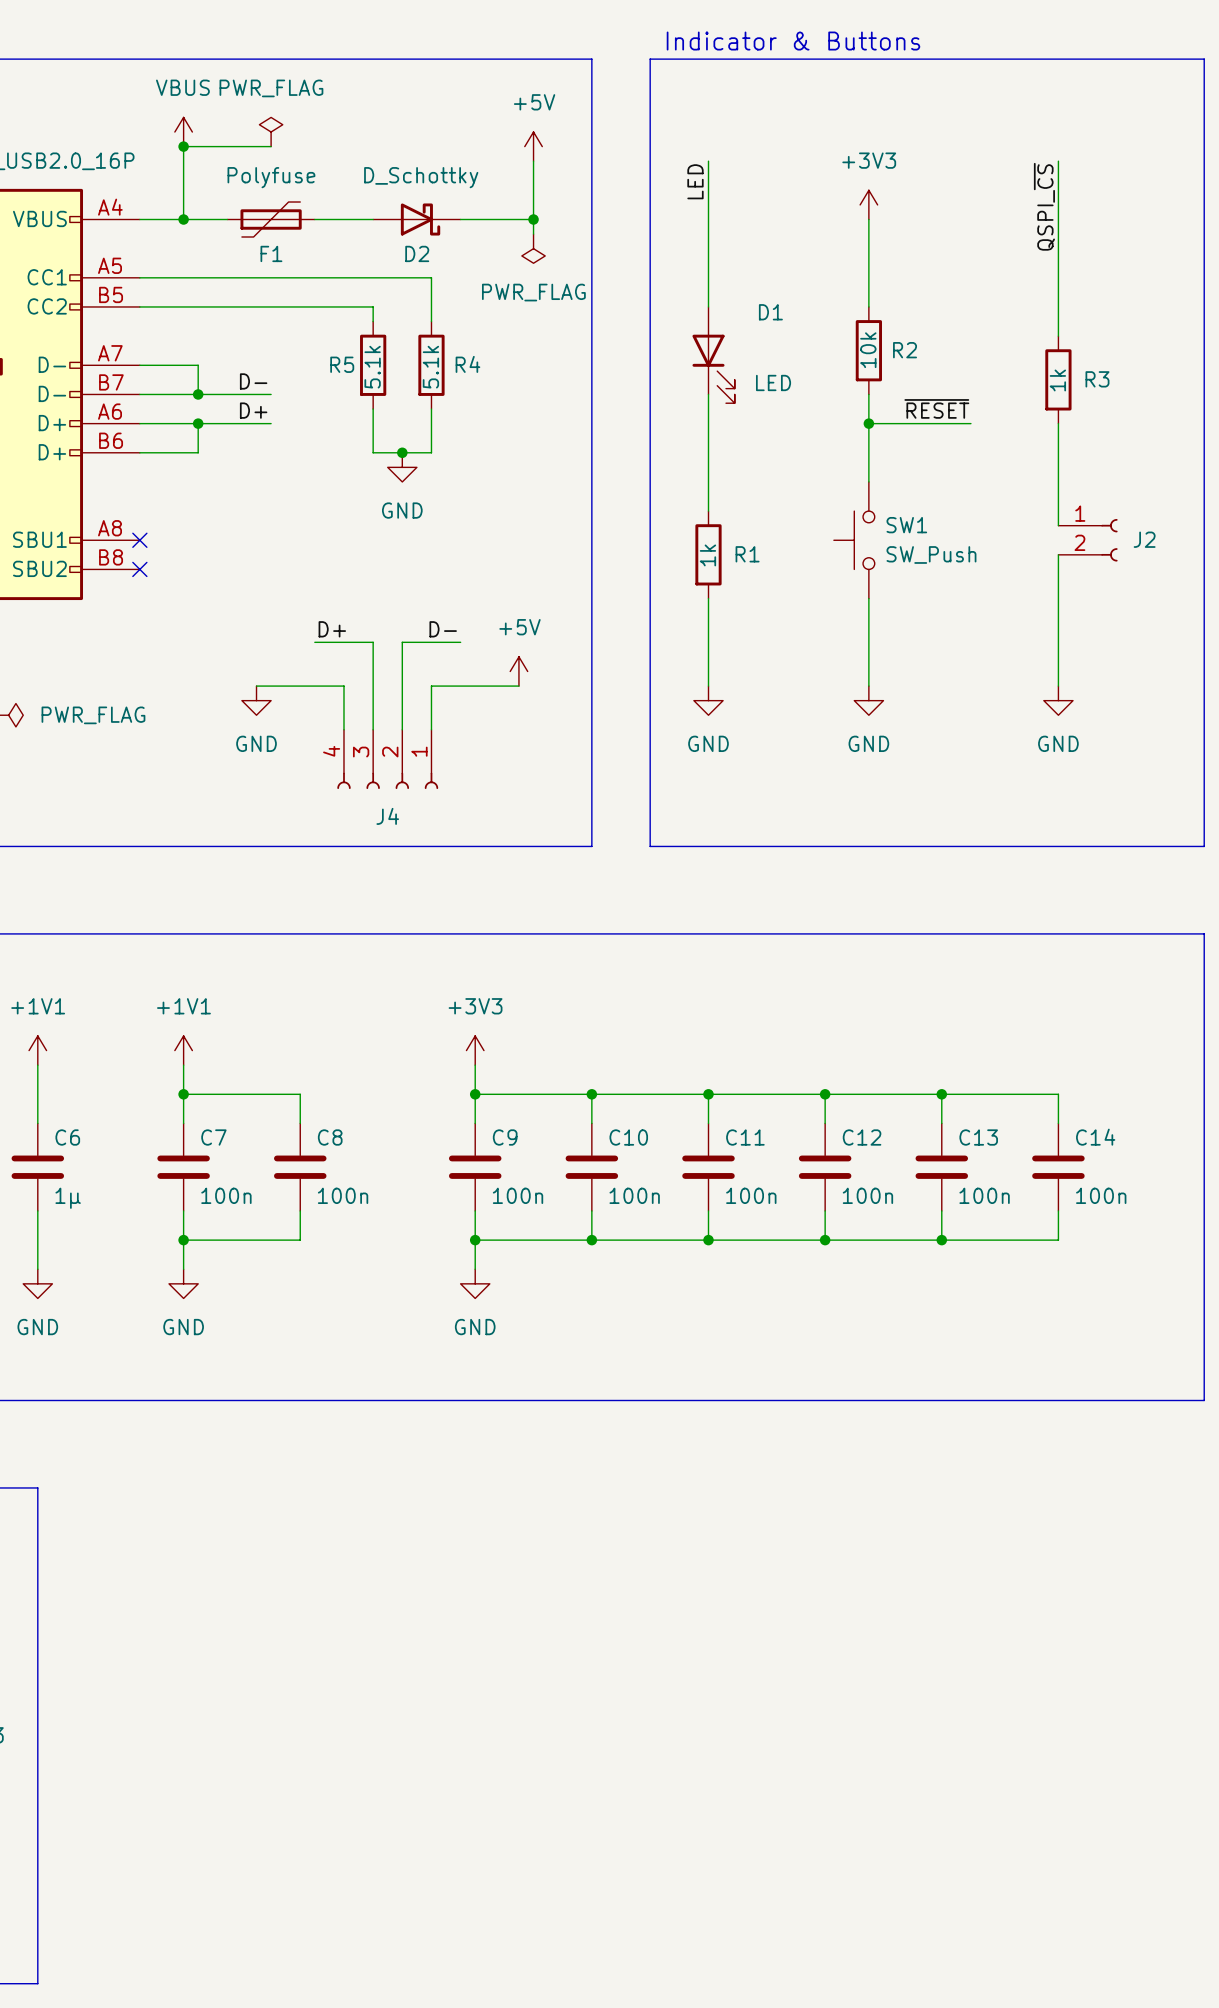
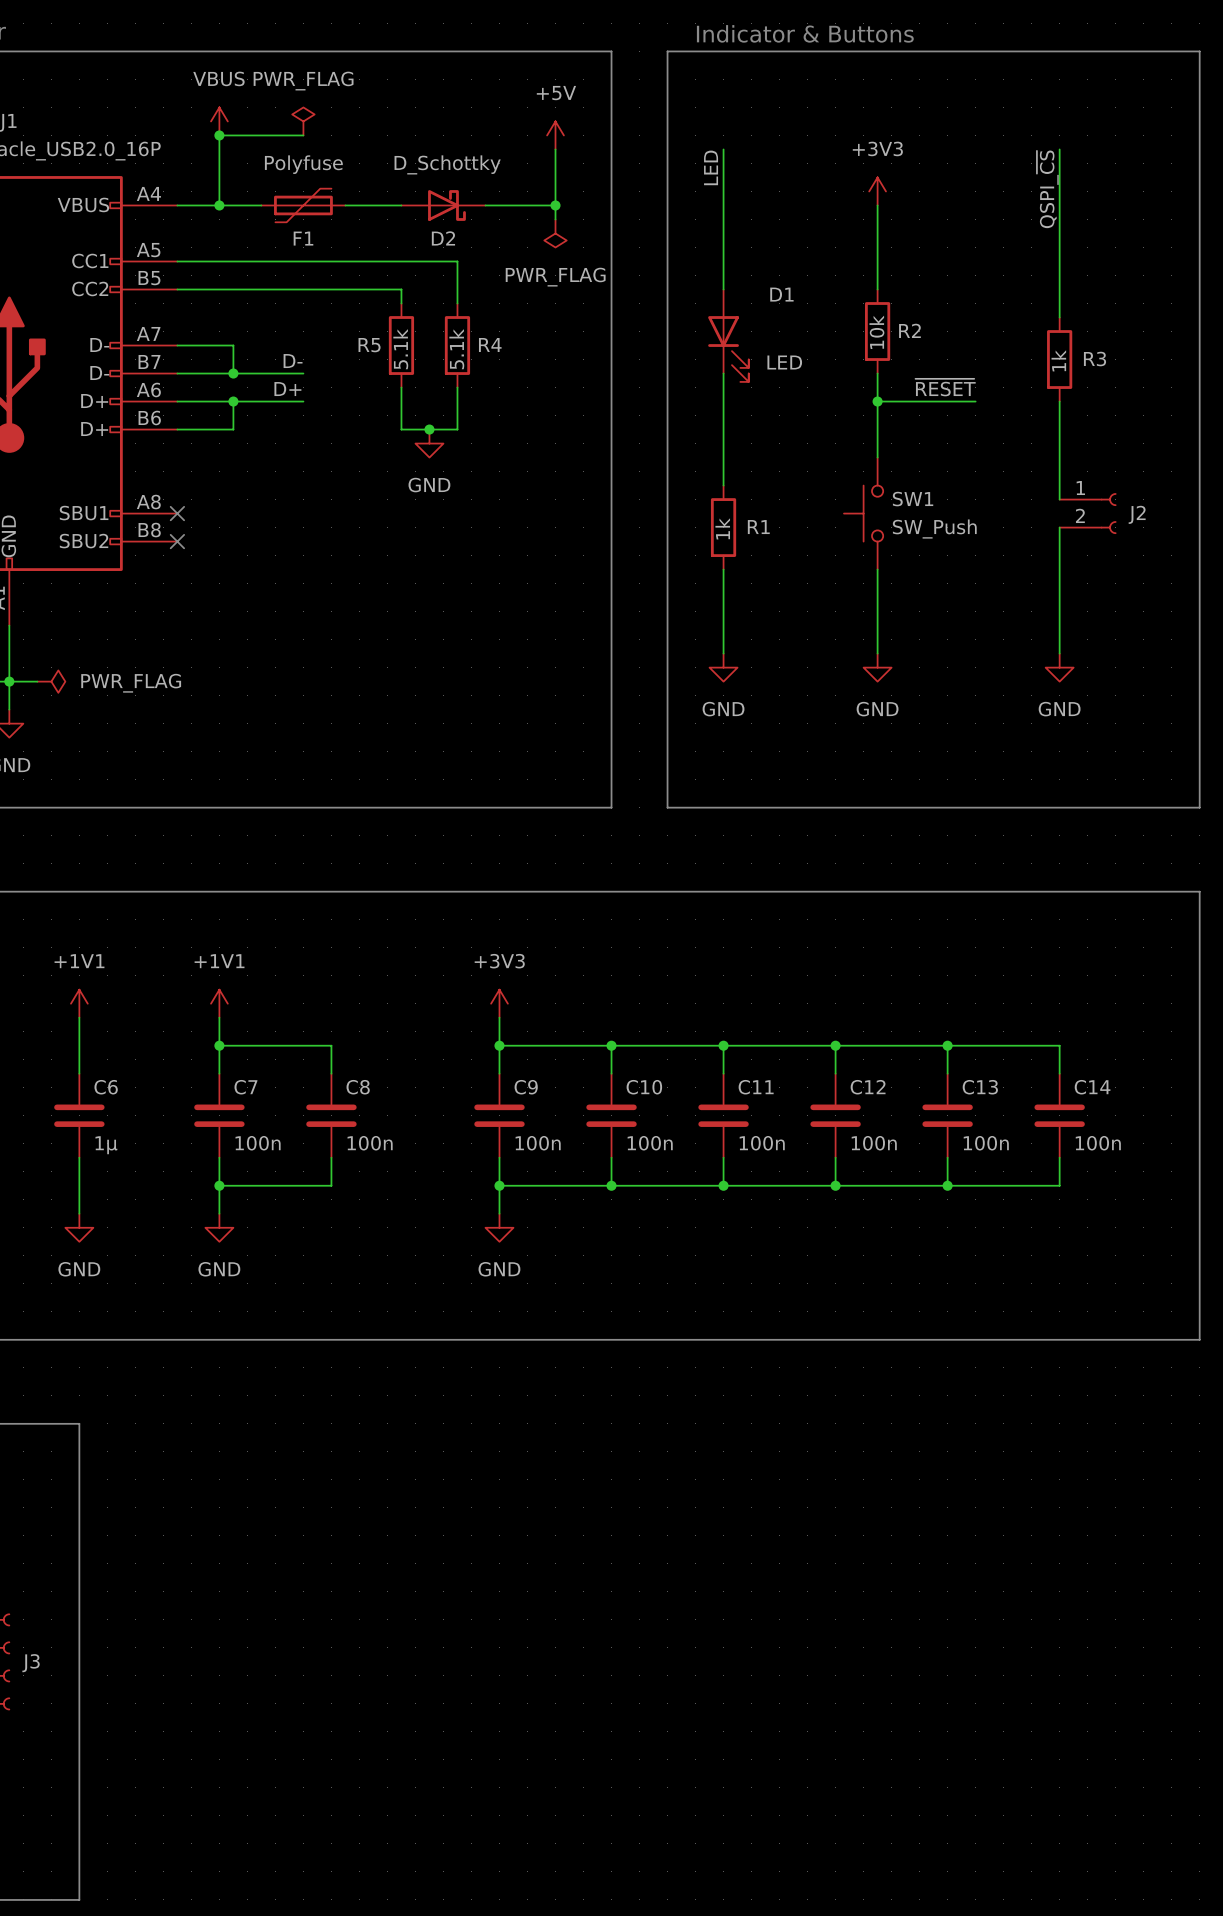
label: D+ (332, 629) -> none
label: D- (443, 629) -> none
wire: (314, 642) (373, 642) (373, 729) -> none
wire: (460, 642) (402, 642) (402, 729) -> none
power symbol: +5V (518, 671) -> none
wire: (256, 686) (343, 686) (343, 729) -> none
wire: (518, 686) (431, 686) (431, 729) -> none
power symbol: GND (256, 700) -> none
J4: (387, 759) -> none

